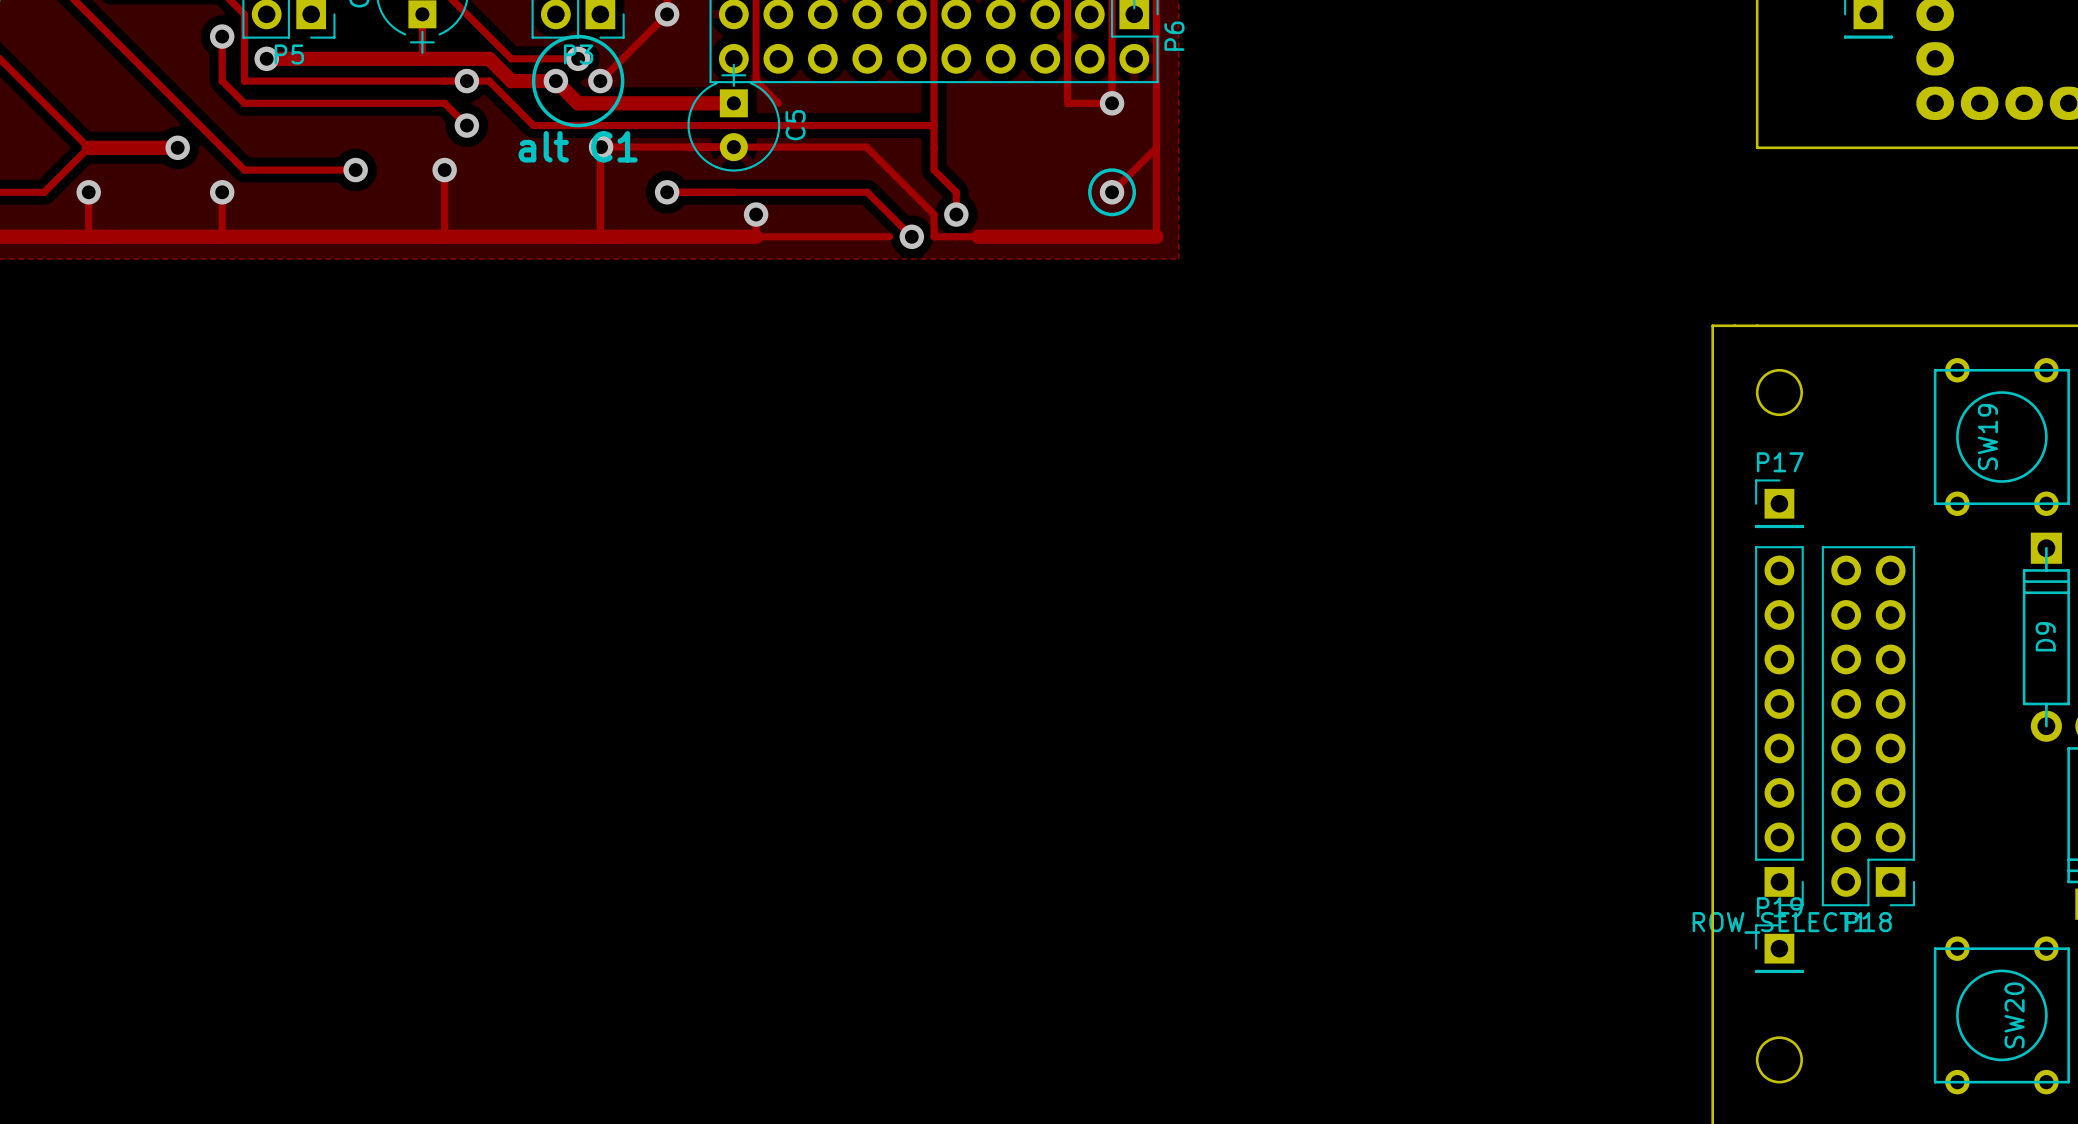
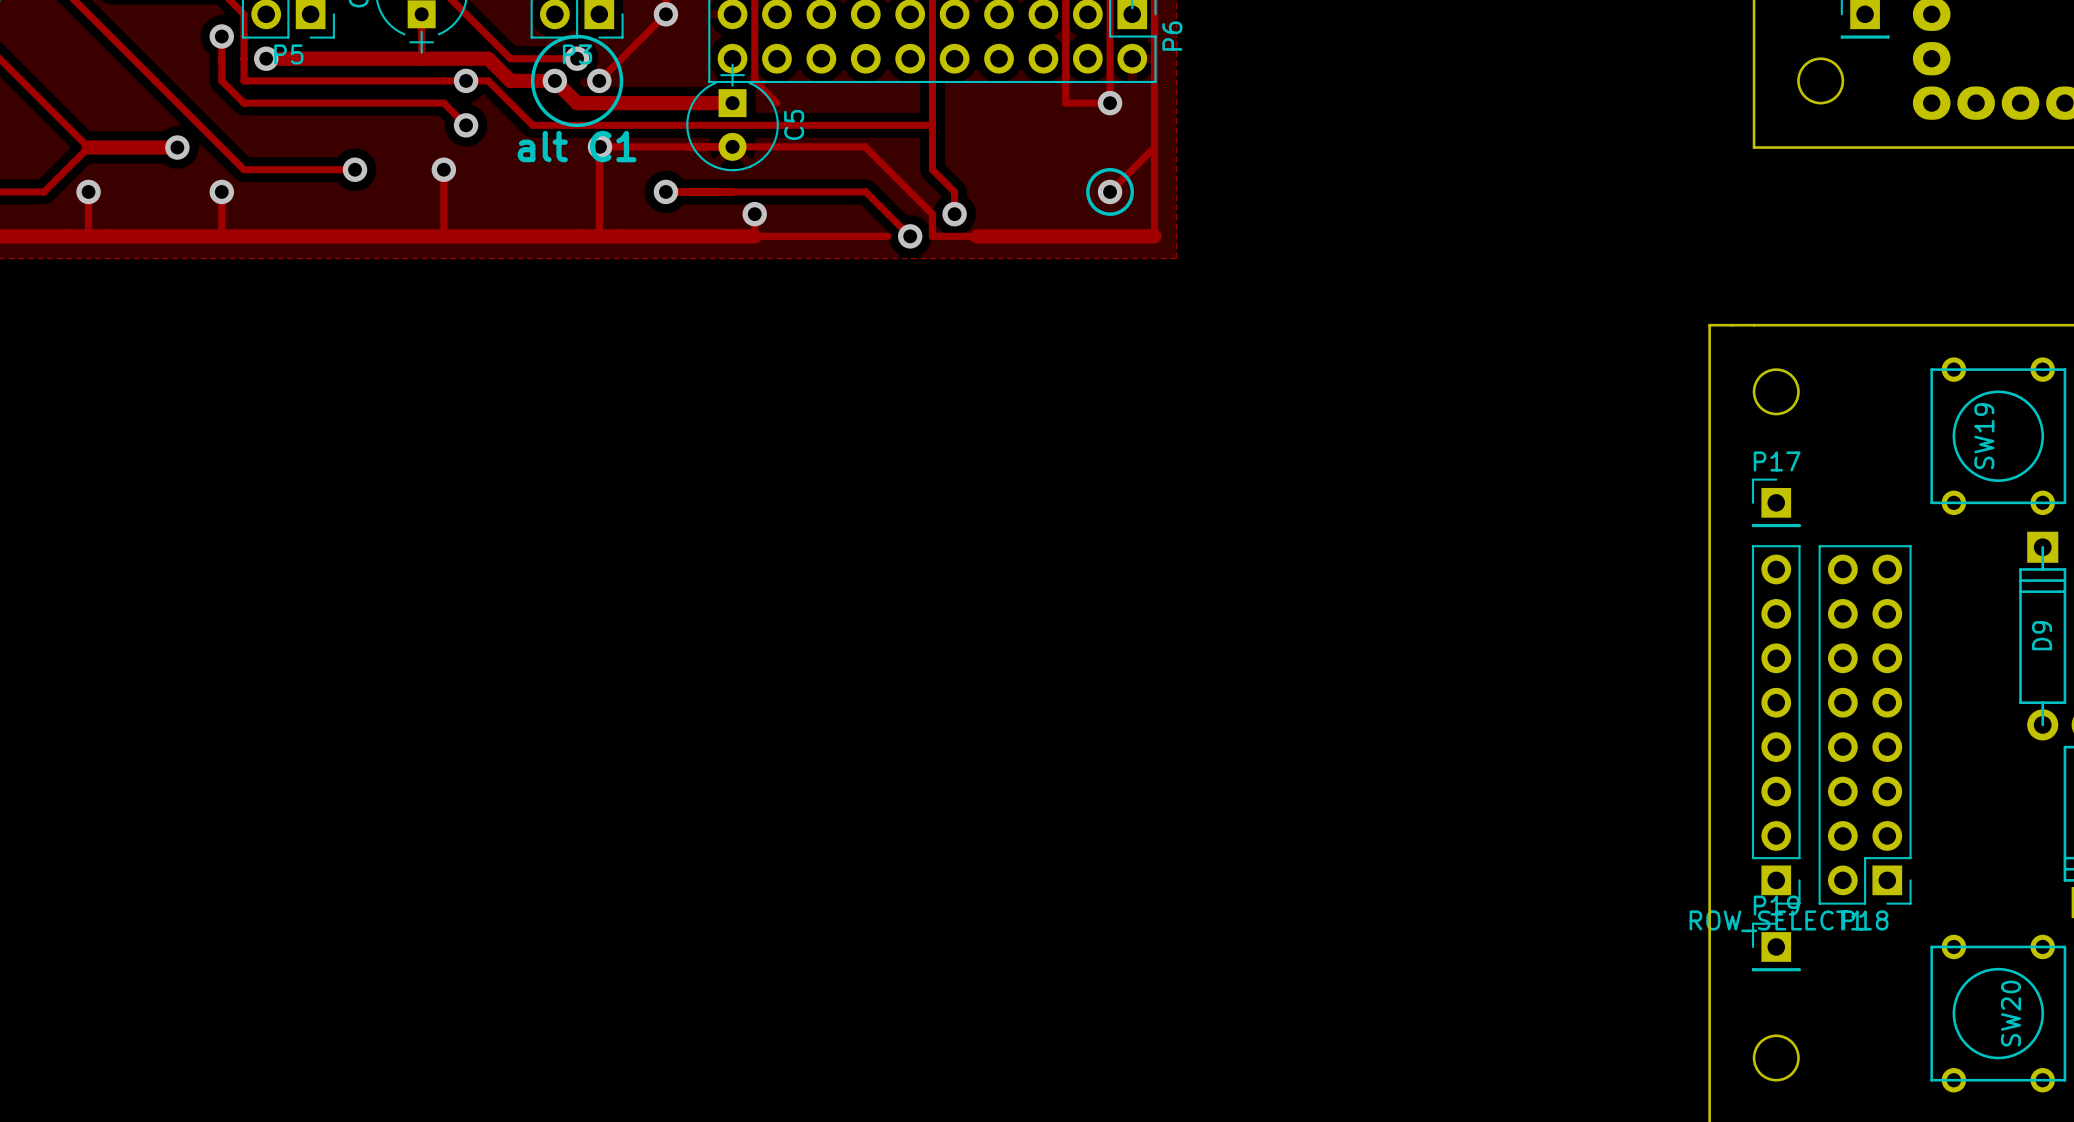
round board edge: none -> [1797, 57, 1845, 105]

